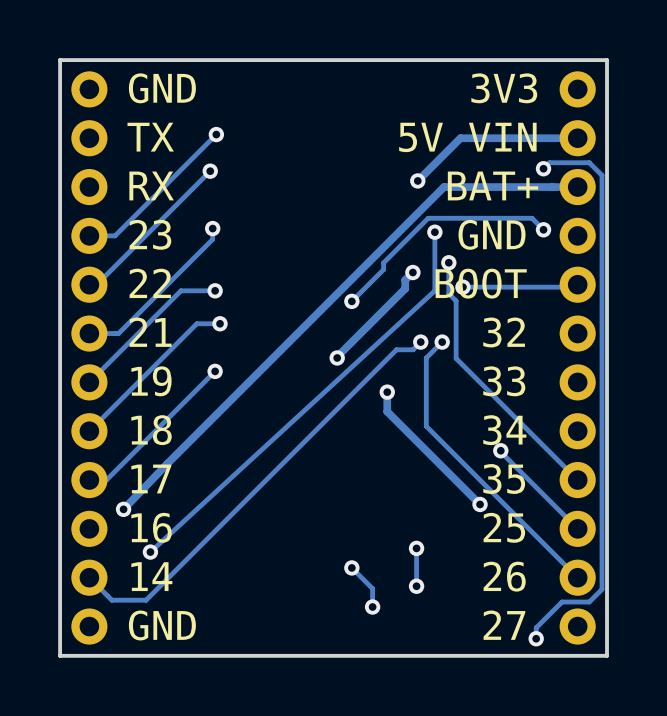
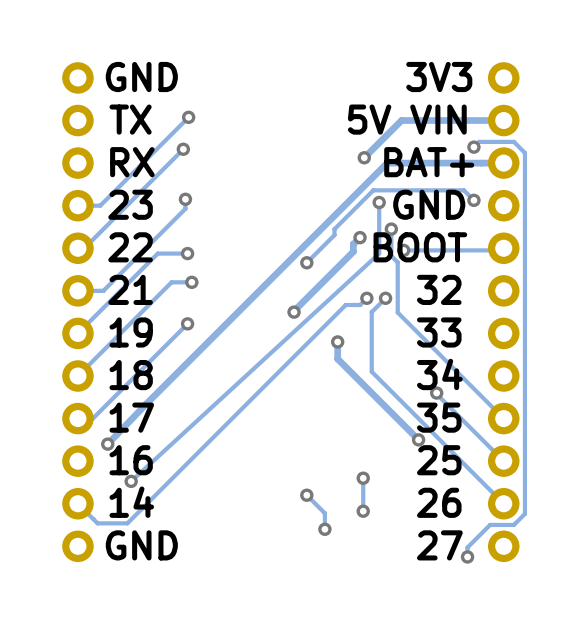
board edge: (607, 60) (607, 655) (60, 655) (60, 60) (607, 60) -> none

